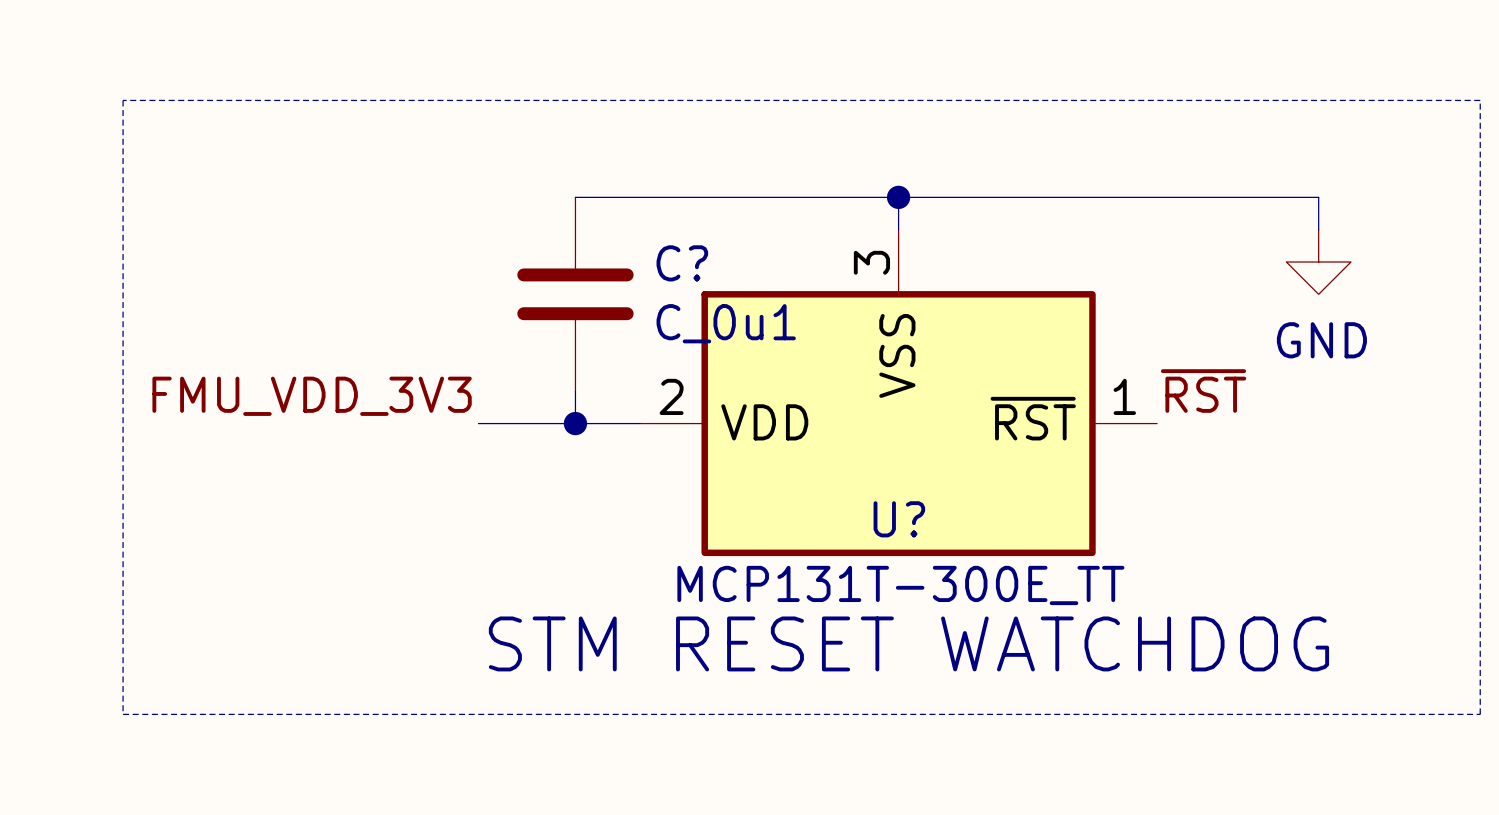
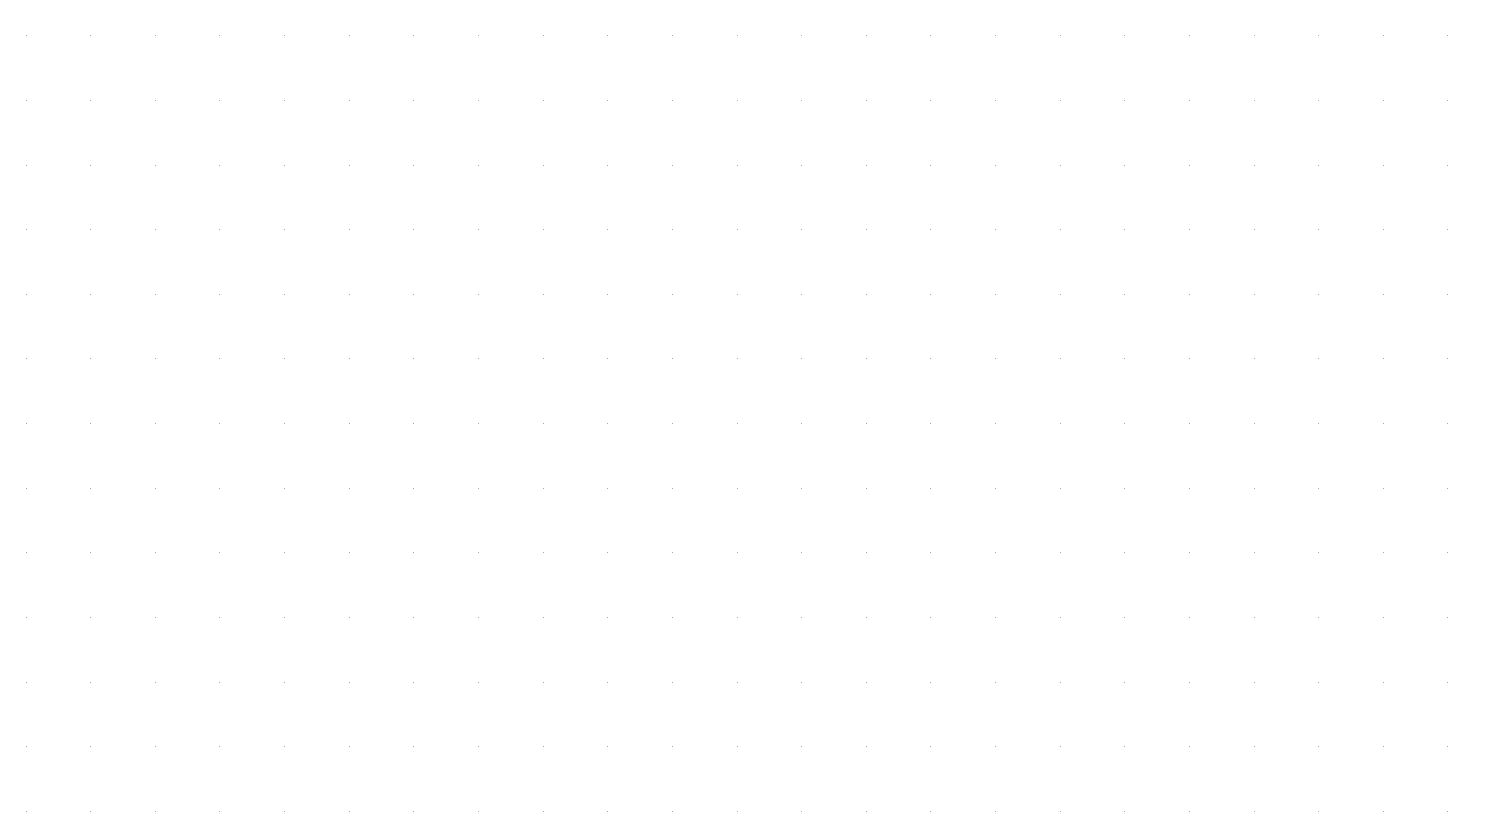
line: (123, 100) (1480, 100) (1480, 714) (123, 714) (123, 100) -> none
wire: (575, 197) (1318, 197) (1318, 229) -> none
wire: (898, 197) (898, 229) -> none
junction: (898, 197) -> none
power symbol: GND (1318, 262) -> none
C?: C_0u1 (575, 294) -> none
wire: (575, 391) (575, 423) -> none
label: ~{RST} (1203, 391) -> none
U?: MCP131T-300E_TT (898, 392) -> none
label: FMU_VDD_3V3 (312, 396) -> none
wire: (478, 423) (640, 423) -> none
junction: (575, 423) -> none
text: STM RESET WATCHDOG (908, 643) -> none

